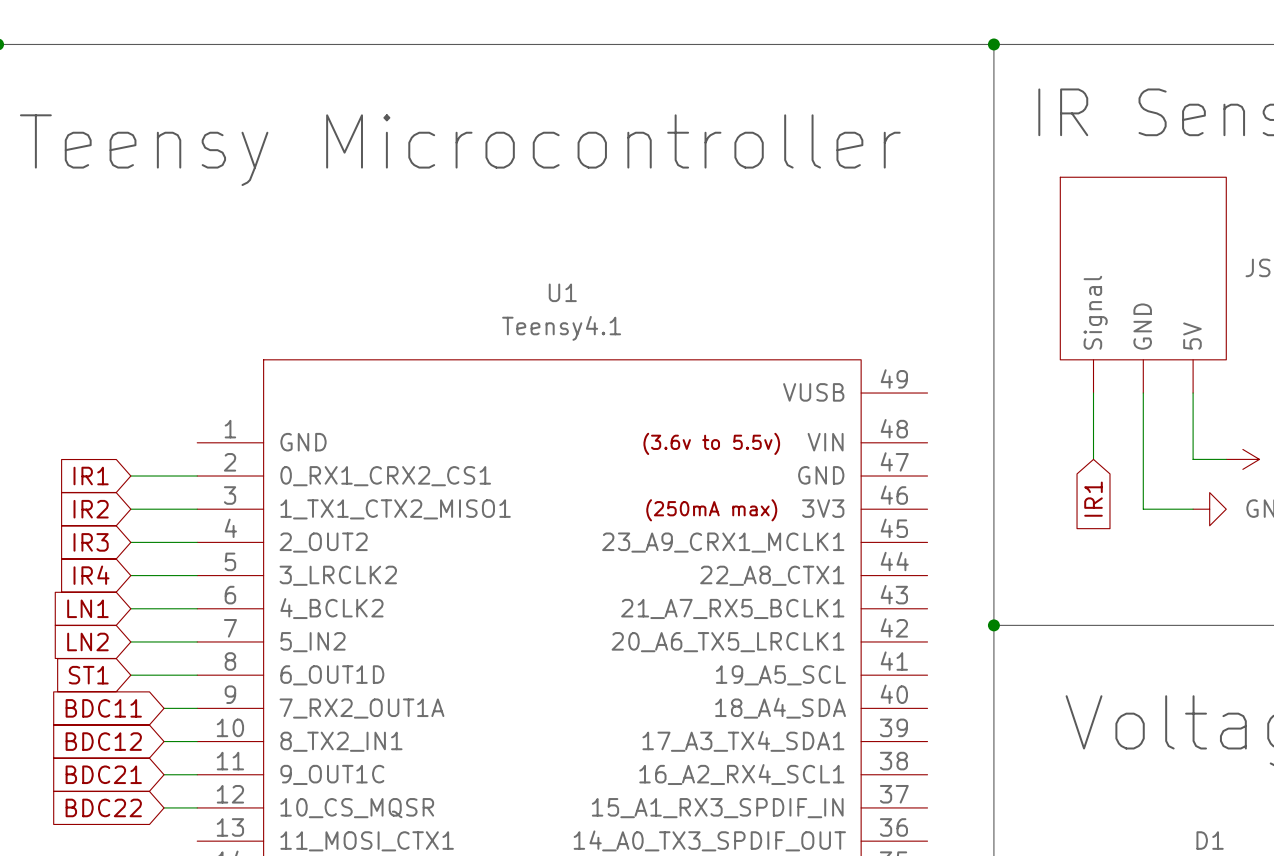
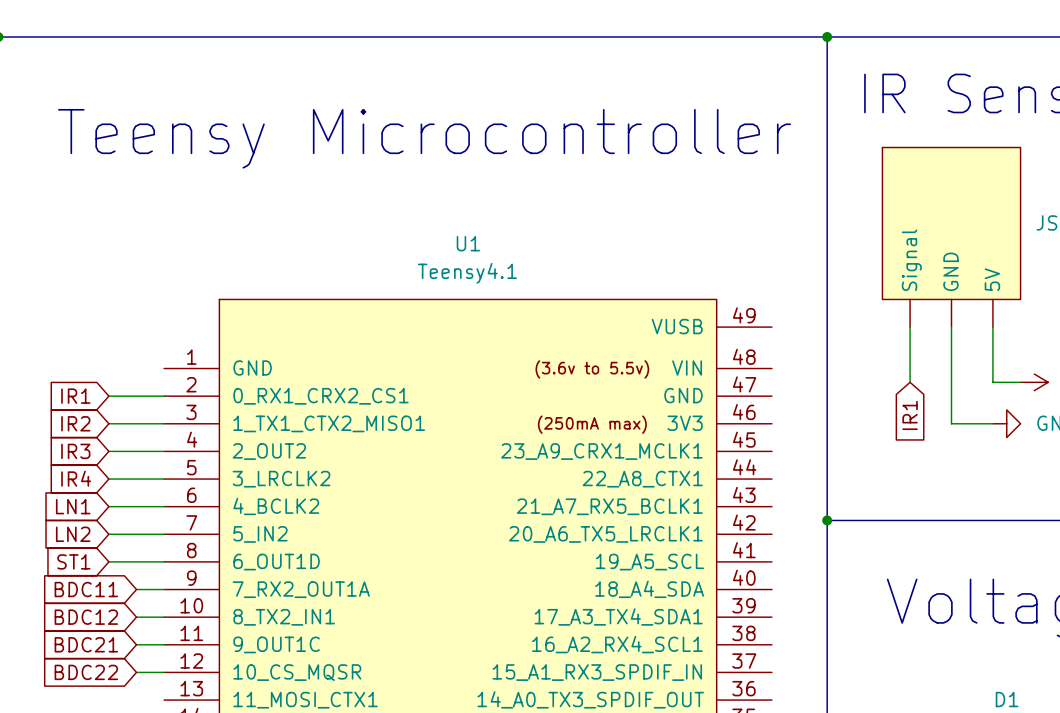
text position: Teensy Microcontroller (460, 150) -> Teensy Microcontroller (424, 138)

